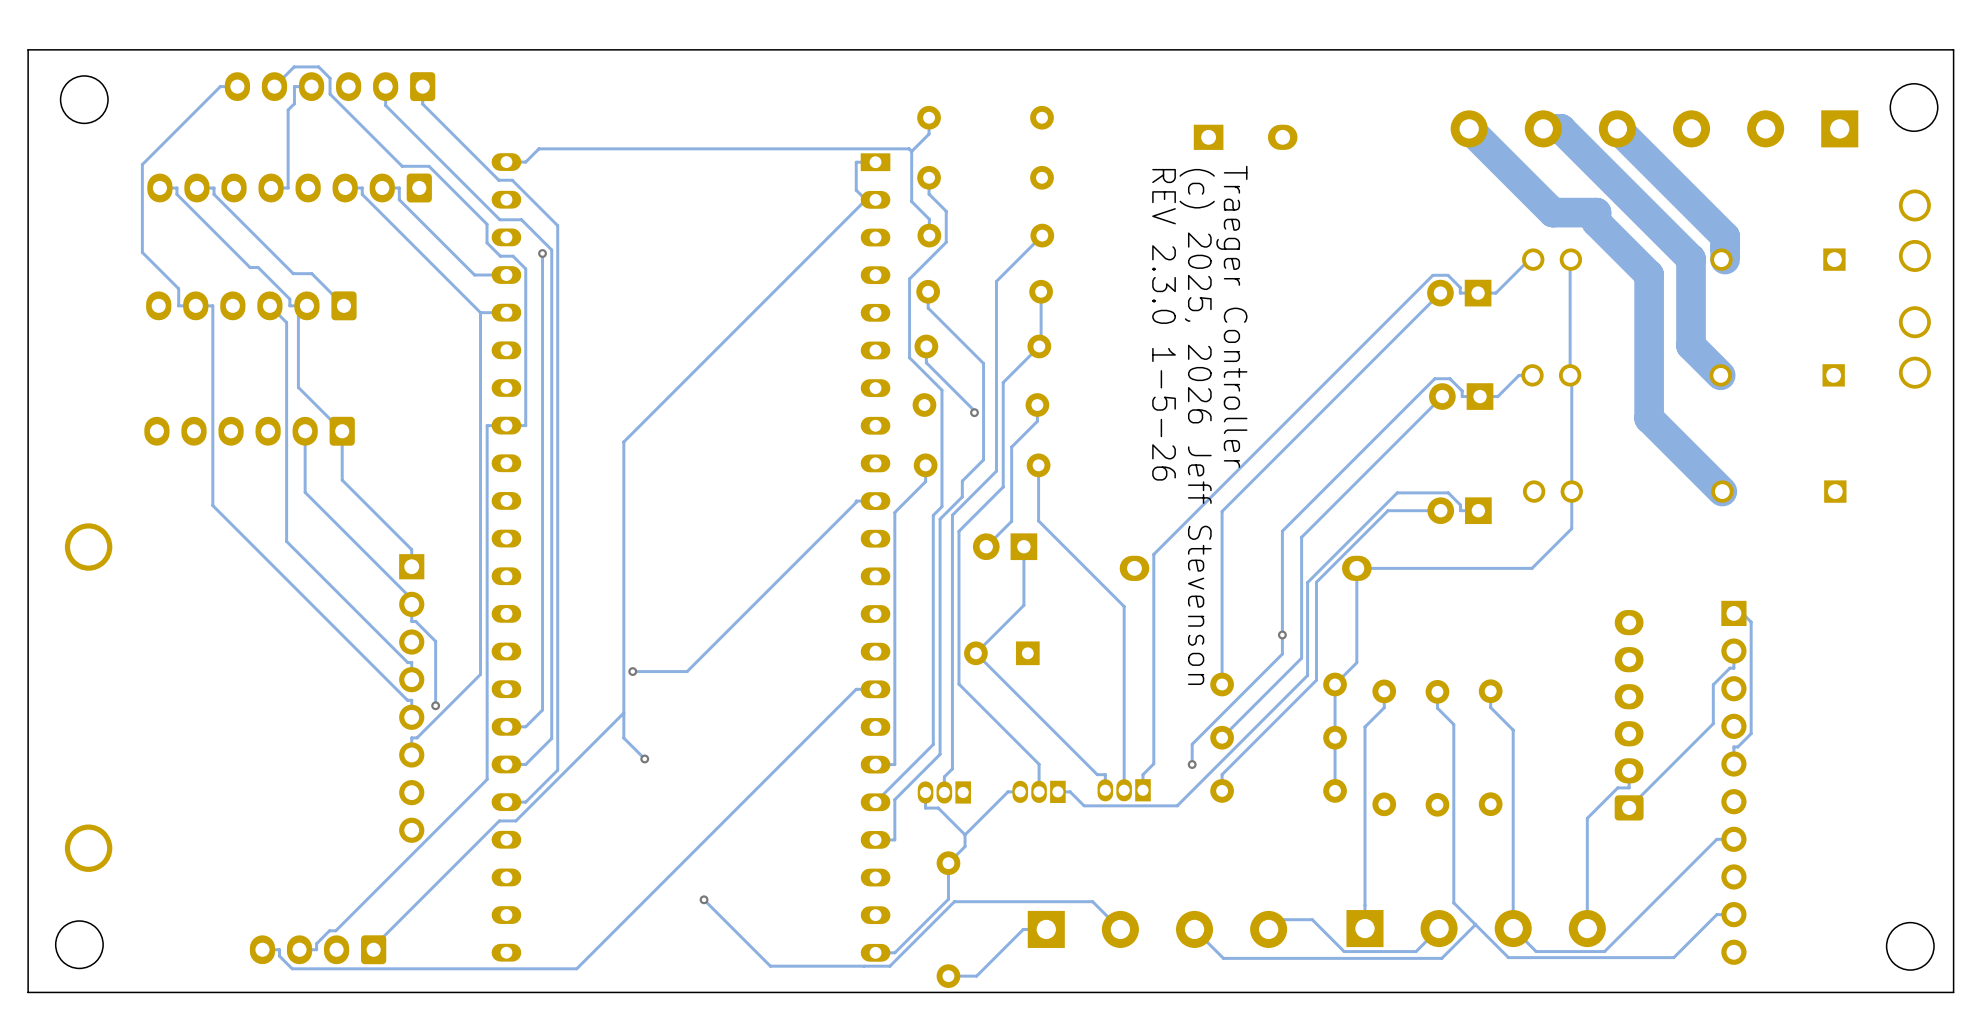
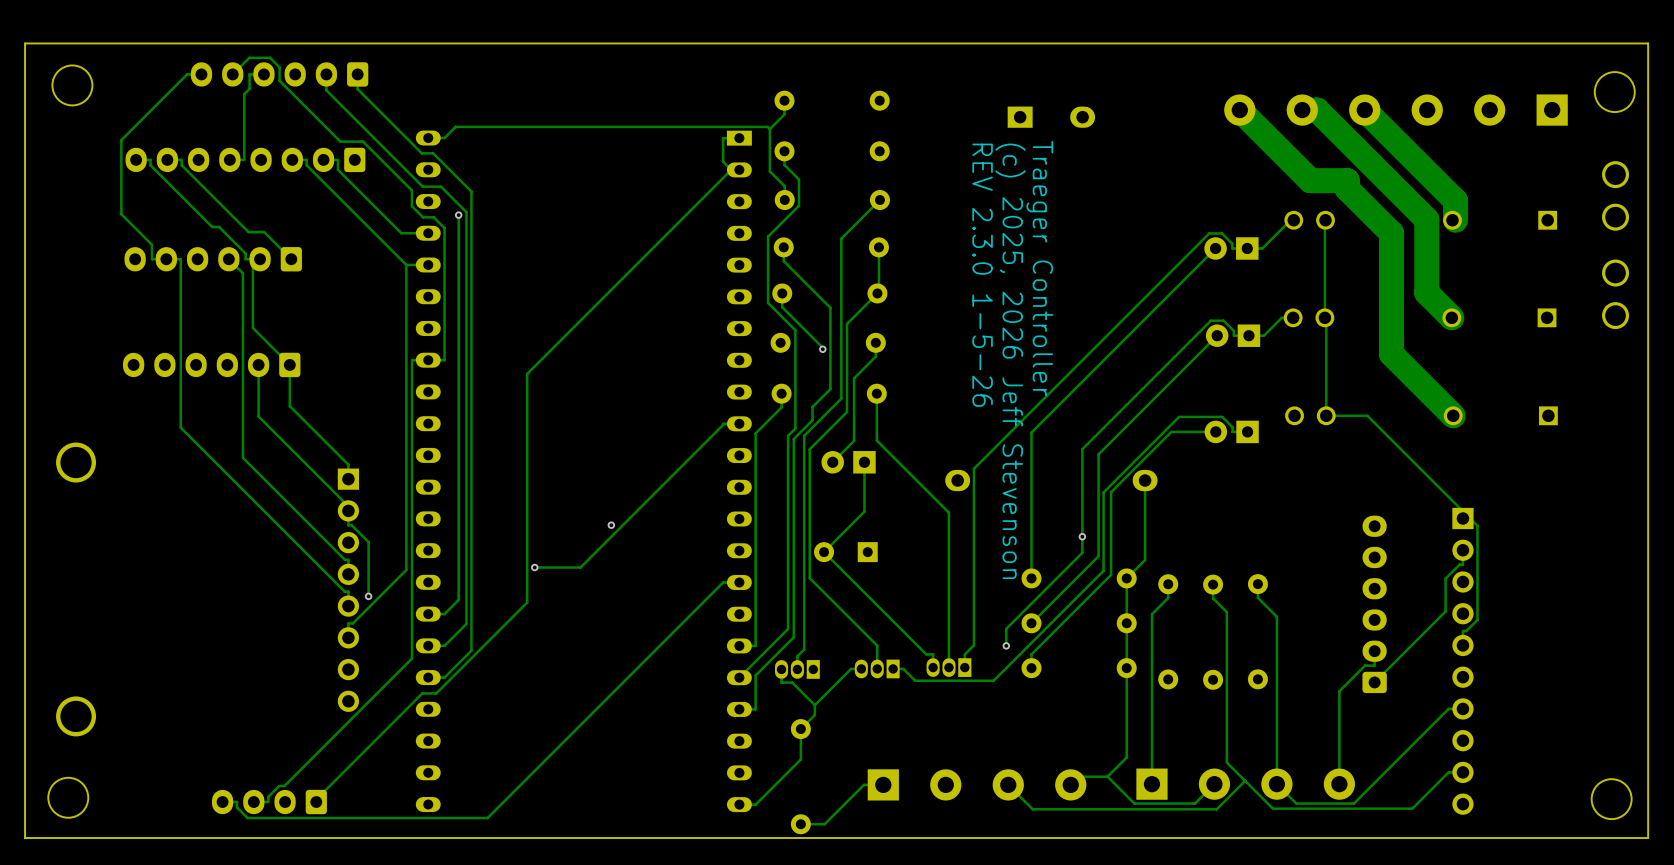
track: (1571, 491) (1571, 528) (1532, 568) (1356, 568) -> (1326, 415) (1367, 415) (1462, 511)
via: none -> (611, 525)
track: (623, 713) (623, 738) (644, 758) -> none
via: (644, 758) -> none
track: none -> (1126, 668) (1126, 757) (1107, 776)
track: (704, 899) (770, 966) (889, 966) (954, 901) (1092, 901) (1120, 929) -> none
via: (704, 899) -> none

